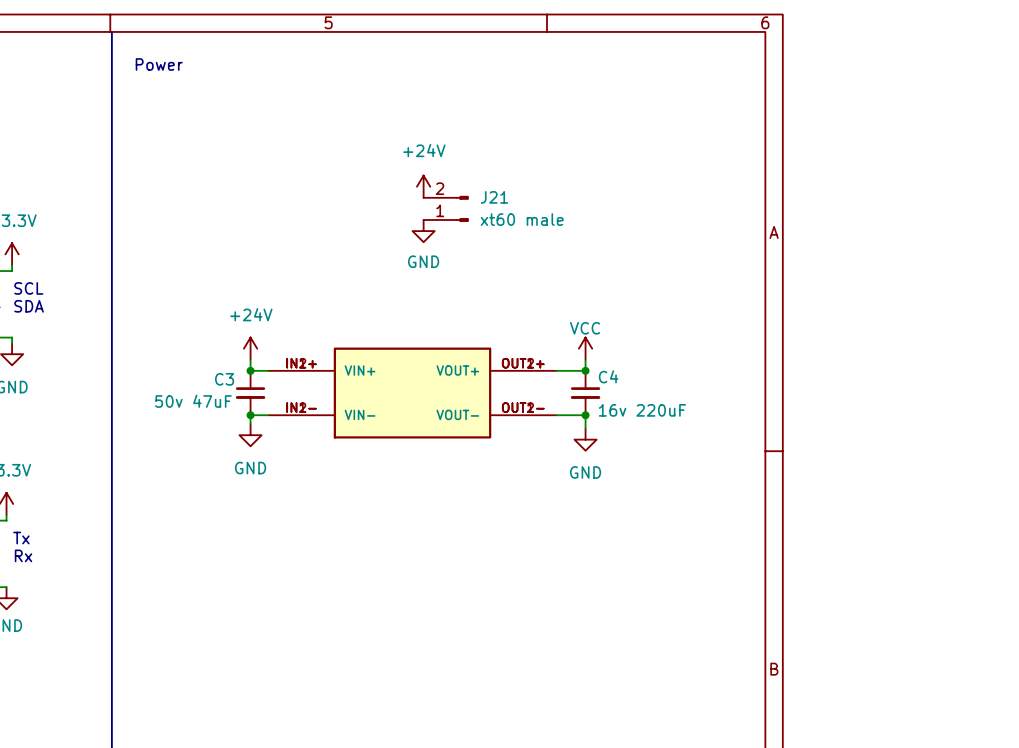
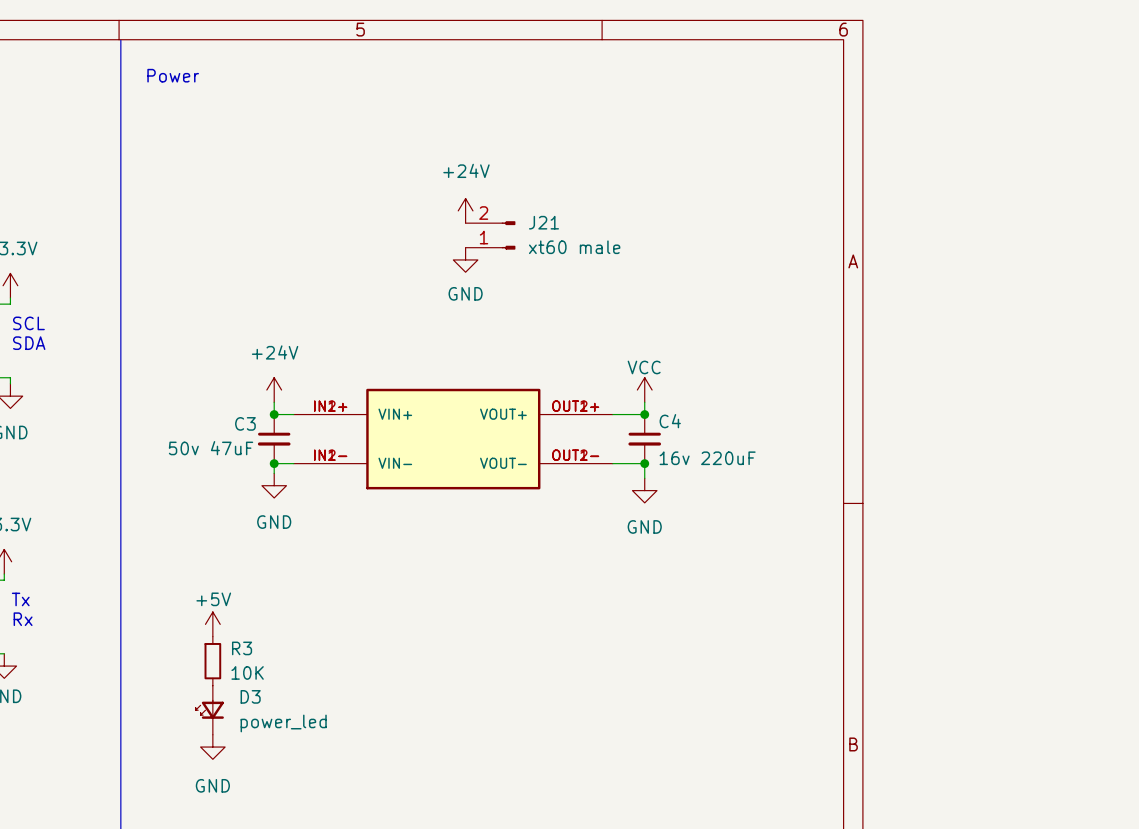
power symbol: none -> +5V (212, 624)
R3: none -> 10K (212, 661)
D3: none -> power_led (209, 710)
power symbol: none -> GND (212, 747)

